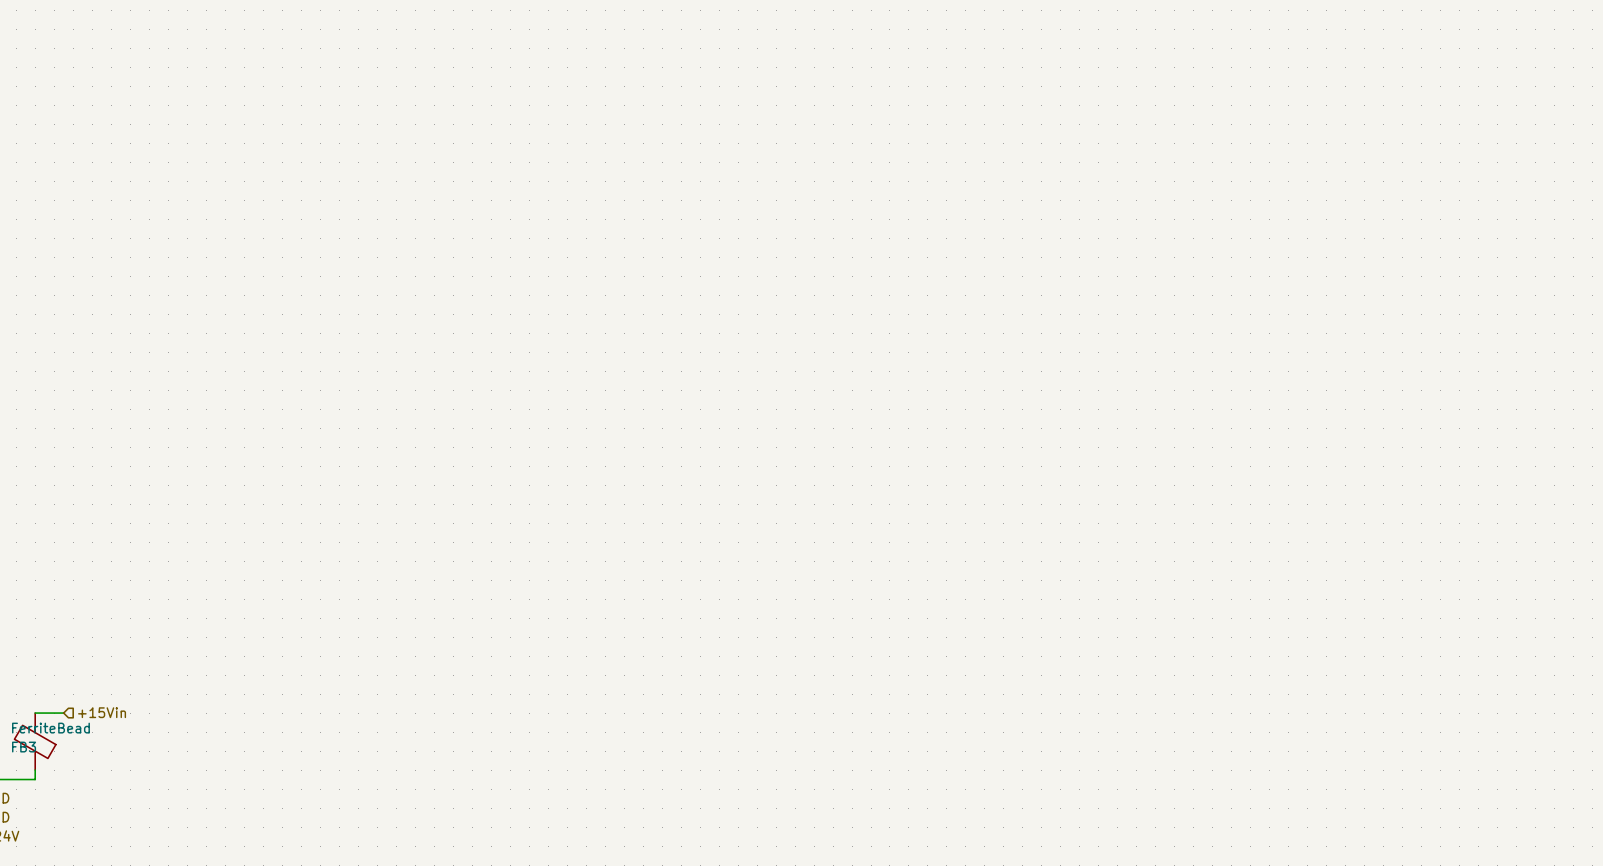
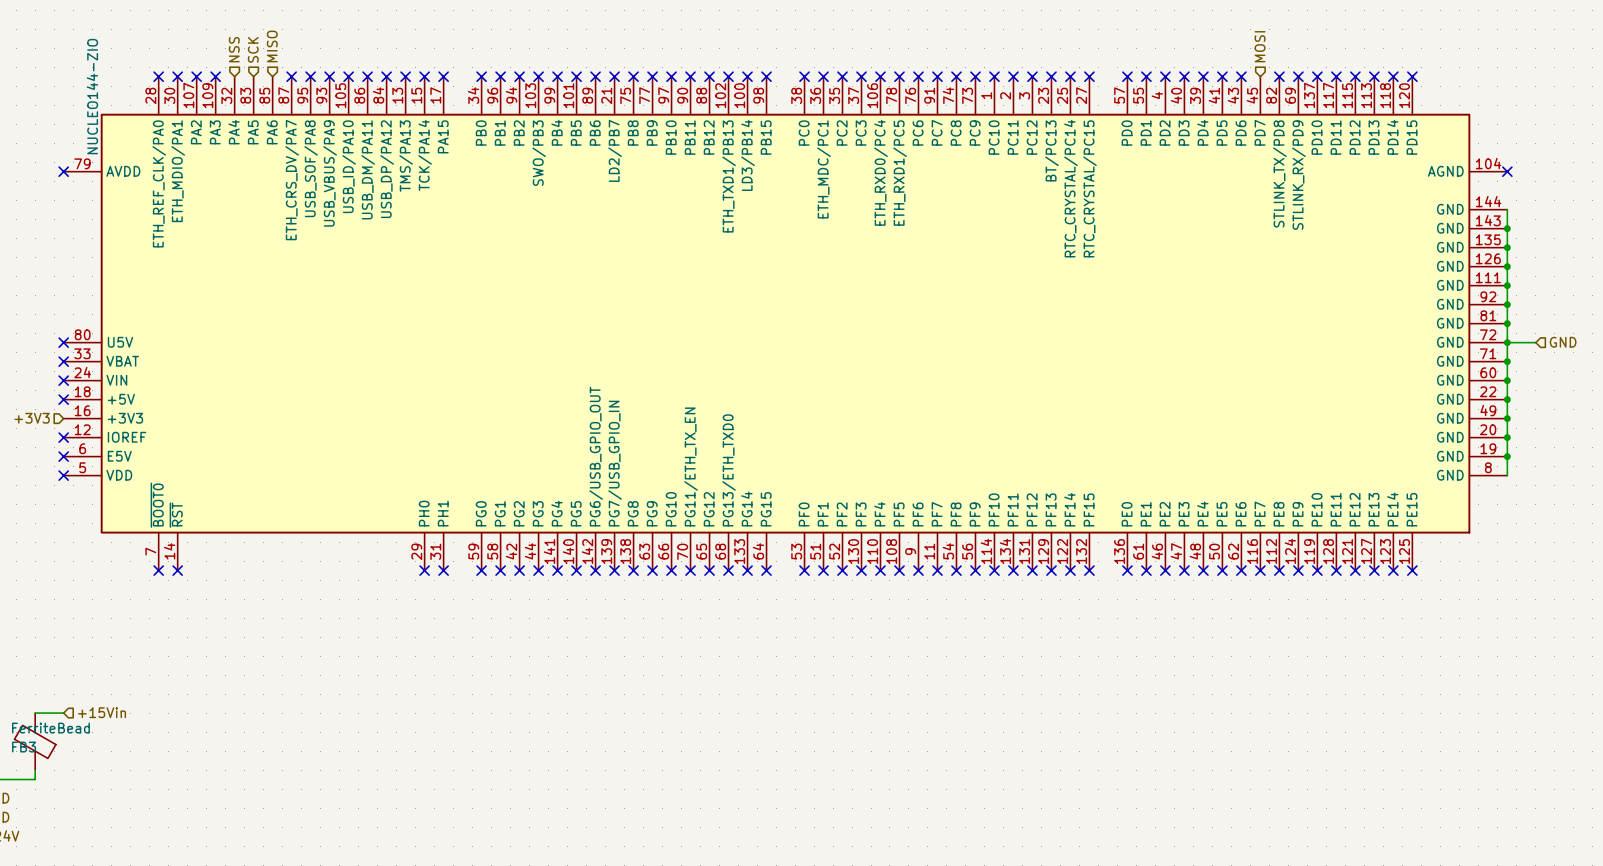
hierarchical label: none -> MISO (272, 46)
hierarchical label: none -> MOSI (1260, 46)
hierarchical label: none -> NSS (234, 49)
hierarchical label: none -> SCK (253, 49)
no-connect mark: none -> (158, 76)
no-connect mark: none -> (177, 76)
no-connect mark: none -> (196, 76)
no-connect mark: none -> (215, 76)
no-connect mark: none -> (291, 76)
no-connect mark: none -> (310, 76)
no-connect mark: none -> (329, 76)
no-connect mark: none -> (348, 76)
no-connect mark: none -> (367, 76)
no-connect mark: none -> (386, 76)
no-connect mark: none -> (405, 76)
no-connect mark: none -> (424, 76)
no-connect mark: none -> (443, 76)
no-connect mark: none -> (481, 76)
no-connect mark: none -> (500, 76)
no-connect mark: none -> (519, 76)
no-connect mark: none -> (538, 76)
no-connect mark: none -> (557, 76)
no-connect mark: none -> (576, 76)
no-connect mark: none -> (595, 76)
no-connect mark: none -> (614, 76)
no-connect mark: none -> (633, 76)
no-connect mark: none -> (652, 76)
no-connect mark: none -> (671, 76)
no-connect mark: none -> (690, 76)
no-connect mark: none -> (709, 76)
no-connect mark: none -> (728, 76)
no-connect mark: none -> (747, 76)
no-connect mark: none -> (766, 76)
no-connect mark: none -> (804, 76)
no-connect mark: none -> (823, 76)
no-connect mark: none -> (842, 76)
no-connect mark: none -> (861, 76)
no-connect mark: none -> (880, 76)
no-connect mark: none -> (899, 76)
no-connect mark: none -> (918, 76)
no-connect mark: none -> (937, 76)
no-connect mark: none -> (956, 76)
no-connect mark: none -> (975, 76)
no-connect mark: none -> (994, 76)
no-connect mark: none -> (1013, 76)
no-connect mark: none -> (1032, 76)
no-connect mark: none -> (1051, 76)
no-connect mark: none -> (1070, 76)
no-connect mark: none -> (1089, 76)
no-connect mark: none -> (1127, 76)
no-connect mark: none -> (1146, 76)
no-connect mark: none -> (1165, 76)
no-connect mark: none -> (1184, 76)
no-connect mark: none -> (1203, 76)
no-connect mark: none -> (1222, 76)
no-connect mark: none -> (1241, 76)
no-connect mark: none -> (1279, 76)
no-connect mark: none -> (1298, 76)
no-connect mark: none -> (1317, 76)
no-connect mark: none -> (1336, 76)
no-connect mark: none -> (1355, 76)
no-connect mark: none -> (1374, 76)
no-connect mark: none -> (1393, 76)
no-connect mark: none -> (1412, 76)
no-connect mark: none -> (63, 171)
no-connect mark: none -> (1507, 171)
wire: none -> (1507, 209) (1507, 475)
junction: none -> (1507, 228)
junction: none -> (1507, 247)
junction: none -> (1507, 266)
junction: none -> (1507, 285)
junction: none -> (1507, 304)
part: none -> NUCLEO144-ZIO (785, 323)
junction: none -> (1507, 323)
no-connect mark: none -> (63, 342)
wire: none -> (1507, 342) (1535, 342)
junction: none -> (1507, 342)
hierarchical label: none -> GND (1563, 342)
no-connect mark: none -> (63, 361)
junction: none -> (1507, 361)
no-connect mark: none -> (63, 380)
junction: none -> (1507, 380)
no-connect mark: none -> (63, 399)
junction: none -> (1507, 399)
hierarchical label: none -> +3V3 (32, 418)
junction: none -> (1507, 418)
no-connect mark: none -> (63, 437)
junction: none -> (1507, 437)
no-connect mark: none -> (63, 456)
junction: none -> (1507, 456)
no-connect mark: none -> (63, 475)
no-connect mark: none -> (158, 570)
no-connect mark: none -> (177, 570)
no-connect mark: none -> (424, 570)
no-connect mark: none -> (443, 570)
no-connect mark: none -> (481, 570)
no-connect mark: none -> (500, 570)
no-connect mark: none -> (519, 570)
no-connect mark: none -> (538, 570)
no-connect mark: none -> (557, 570)
no-connect mark: none -> (576, 570)
no-connect mark: none -> (595, 570)
no-connect mark: none -> (614, 570)
no-connect mark: none -> (633, 570)
no-connect mark: none -> (652, 570)
no-connect mark: none -> (671, 570)
no-connect mark: none -> (690, 570)
no-connect mark: none -> (709, 570)
no-connect mark: none -> (728, 570)
no-connect mark: none -> (747, 570)
no-connect mark: none -> (766, 570)
no-connect mark: none -> (804, 570)
no-connect mark: none -> (823, 570)
no-connect mark: none -> (842, 570)
no-connect mark: none -> (861, 570)
no-connect mark: none -> (880, 570)
no-connect mark: none -> (899, 570)
no-connect mark: none -> (918, 570)
no-connect mark: none -> (937, 570)
no-connect mark: none -> (956, 570)
no-connect mark: none -> (975, 570)
no-connect mark: none -> (994, 570)
no-connect mark: none -> (1013, 570)
no-connect mark: none -> (1032, 570)
no-connect mark: none -> (1051, 570)
no-connect mark: none -> (1070, 570)
no-connect mark: none -> (1089, 570)
no-connect mark: none -> (1127, 570)
no-connect mark: none -> (1146, 570)
no-connect mark: none -> (1165, 570)
no-connect mark: none -> (1184, 570)
no-connect mark: none -> (1203, 570)
no-connect mark: none -> (1222, 570)
no-connect mark: none -> (1241, 570)
no-connect mark: none -> (1260, 570)
no-connect mark: none -> (1279, 570)
no-connect mark: none -> (1298, 570)
no-connect mark: none -> (1317, 570)
no-connect mark: none -> (1336, 570)
no-connect mark: none -> (1355, 570)
no-connect mark: none -> (1374, 570)
no-connect mark: none -> (1393, 570)
no-connect mark: none -> (1412, 570)

